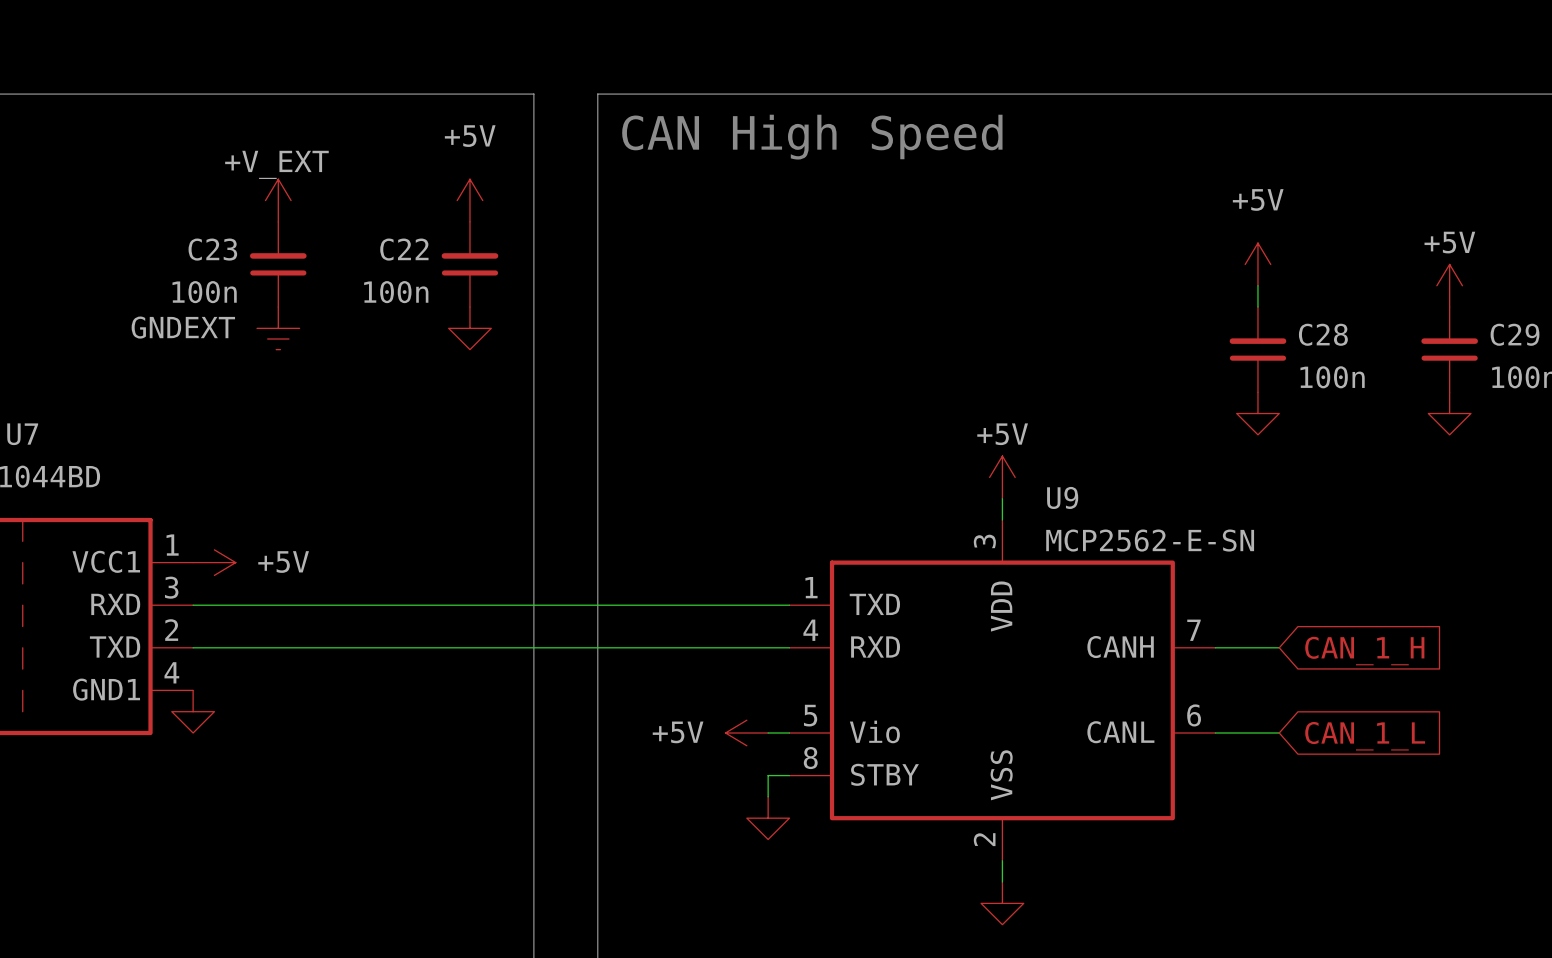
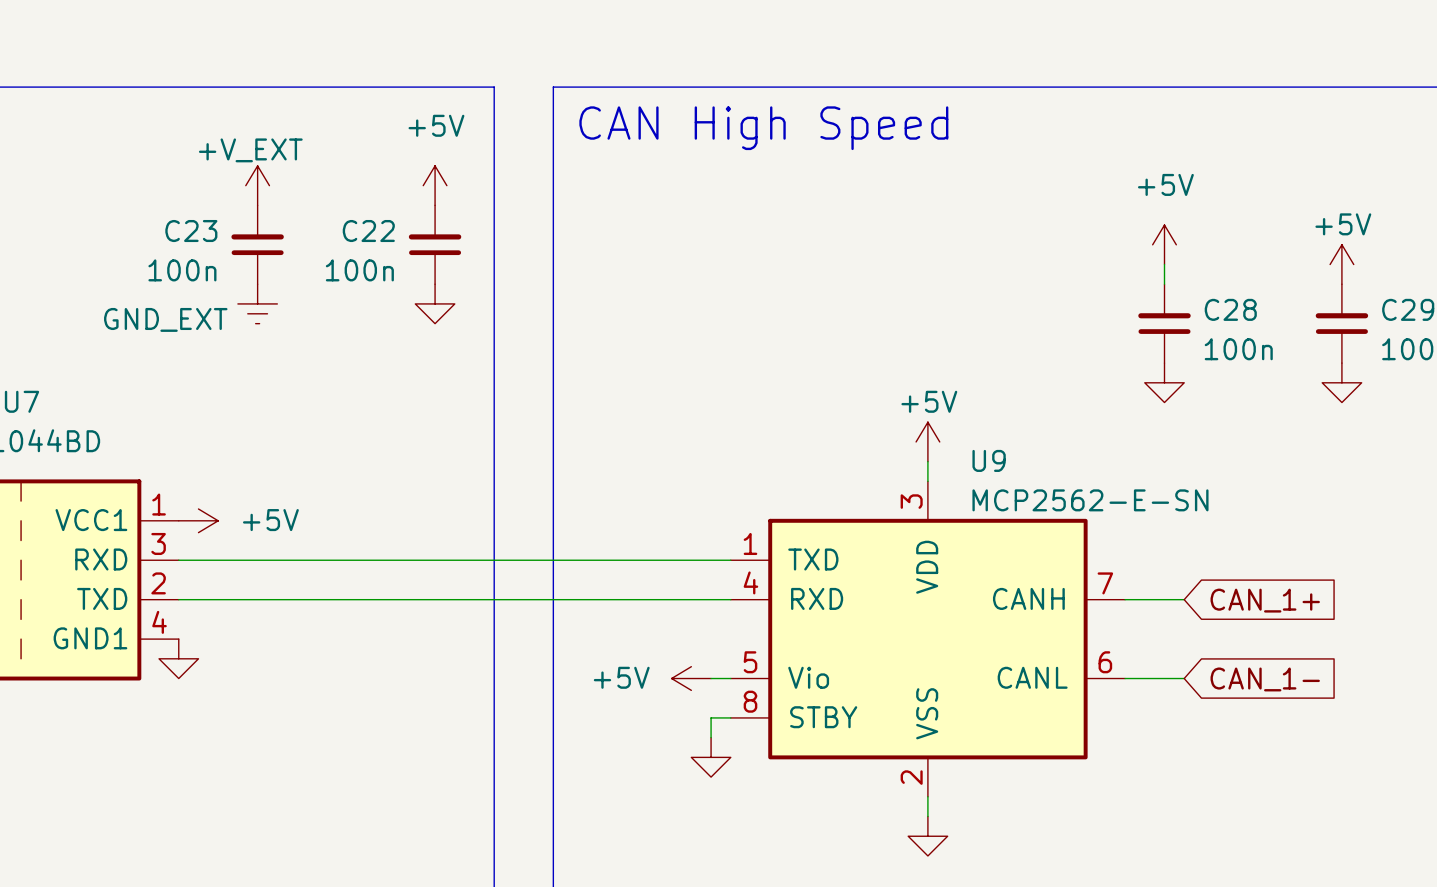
power symbol: GNDEXT (278, 328) -> GND_EXT (257, 303)
global label: CAN_1_H (1364, 651) -> CAN_1+ (1265, 600)
global label: CAN_1_L (1365, 736) -> CAN_1- (1265, 679)

